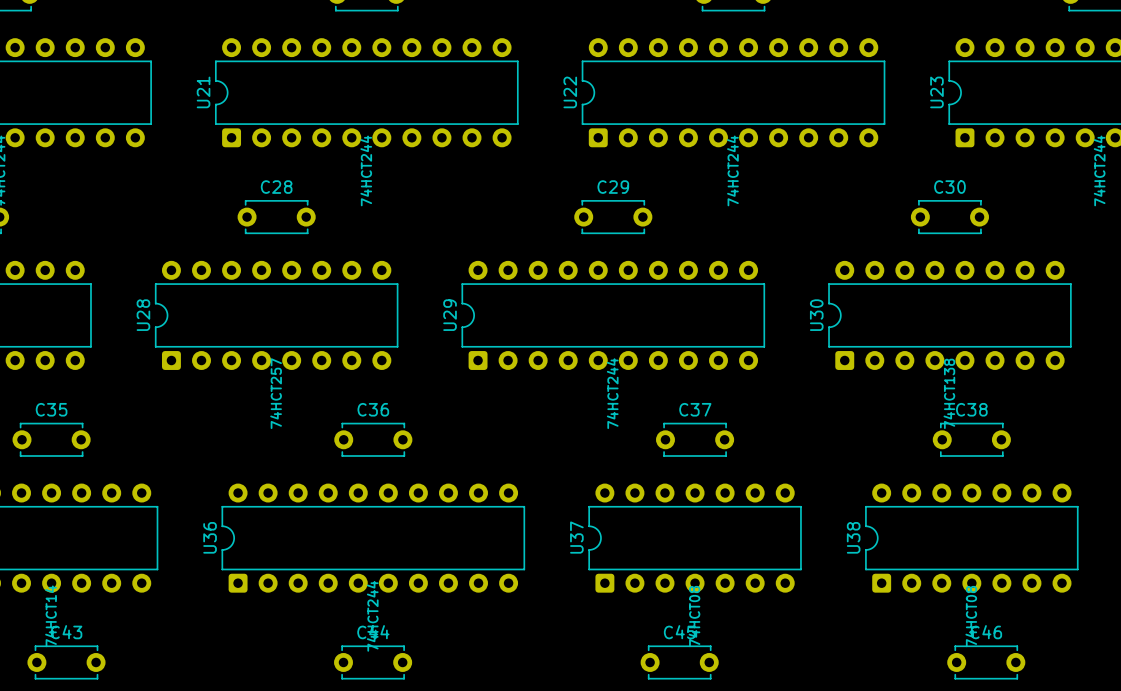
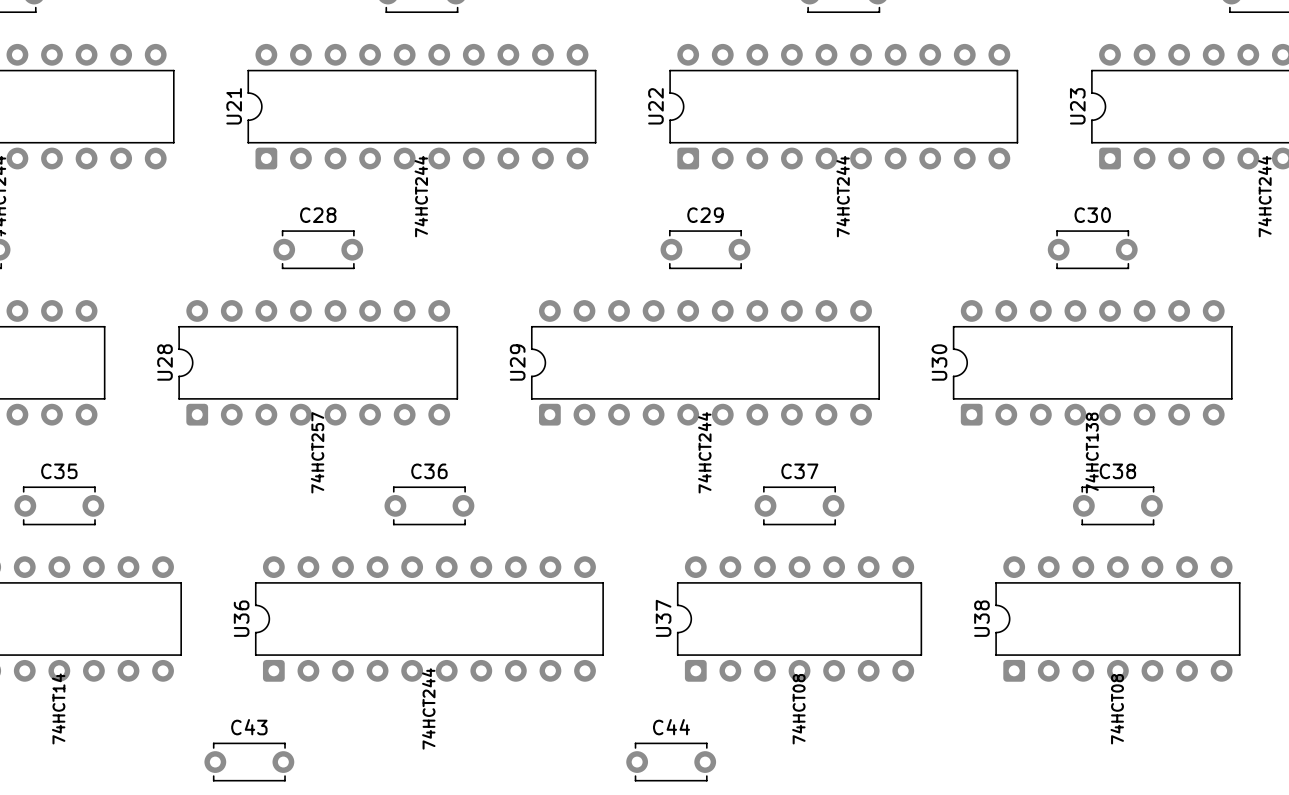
C43 position: (66, 662) -> (249, 762)
C44 position: (373, 662) -> (671, 762)
C45: (679, 662) -> none
C46: (986, 662) -> none

